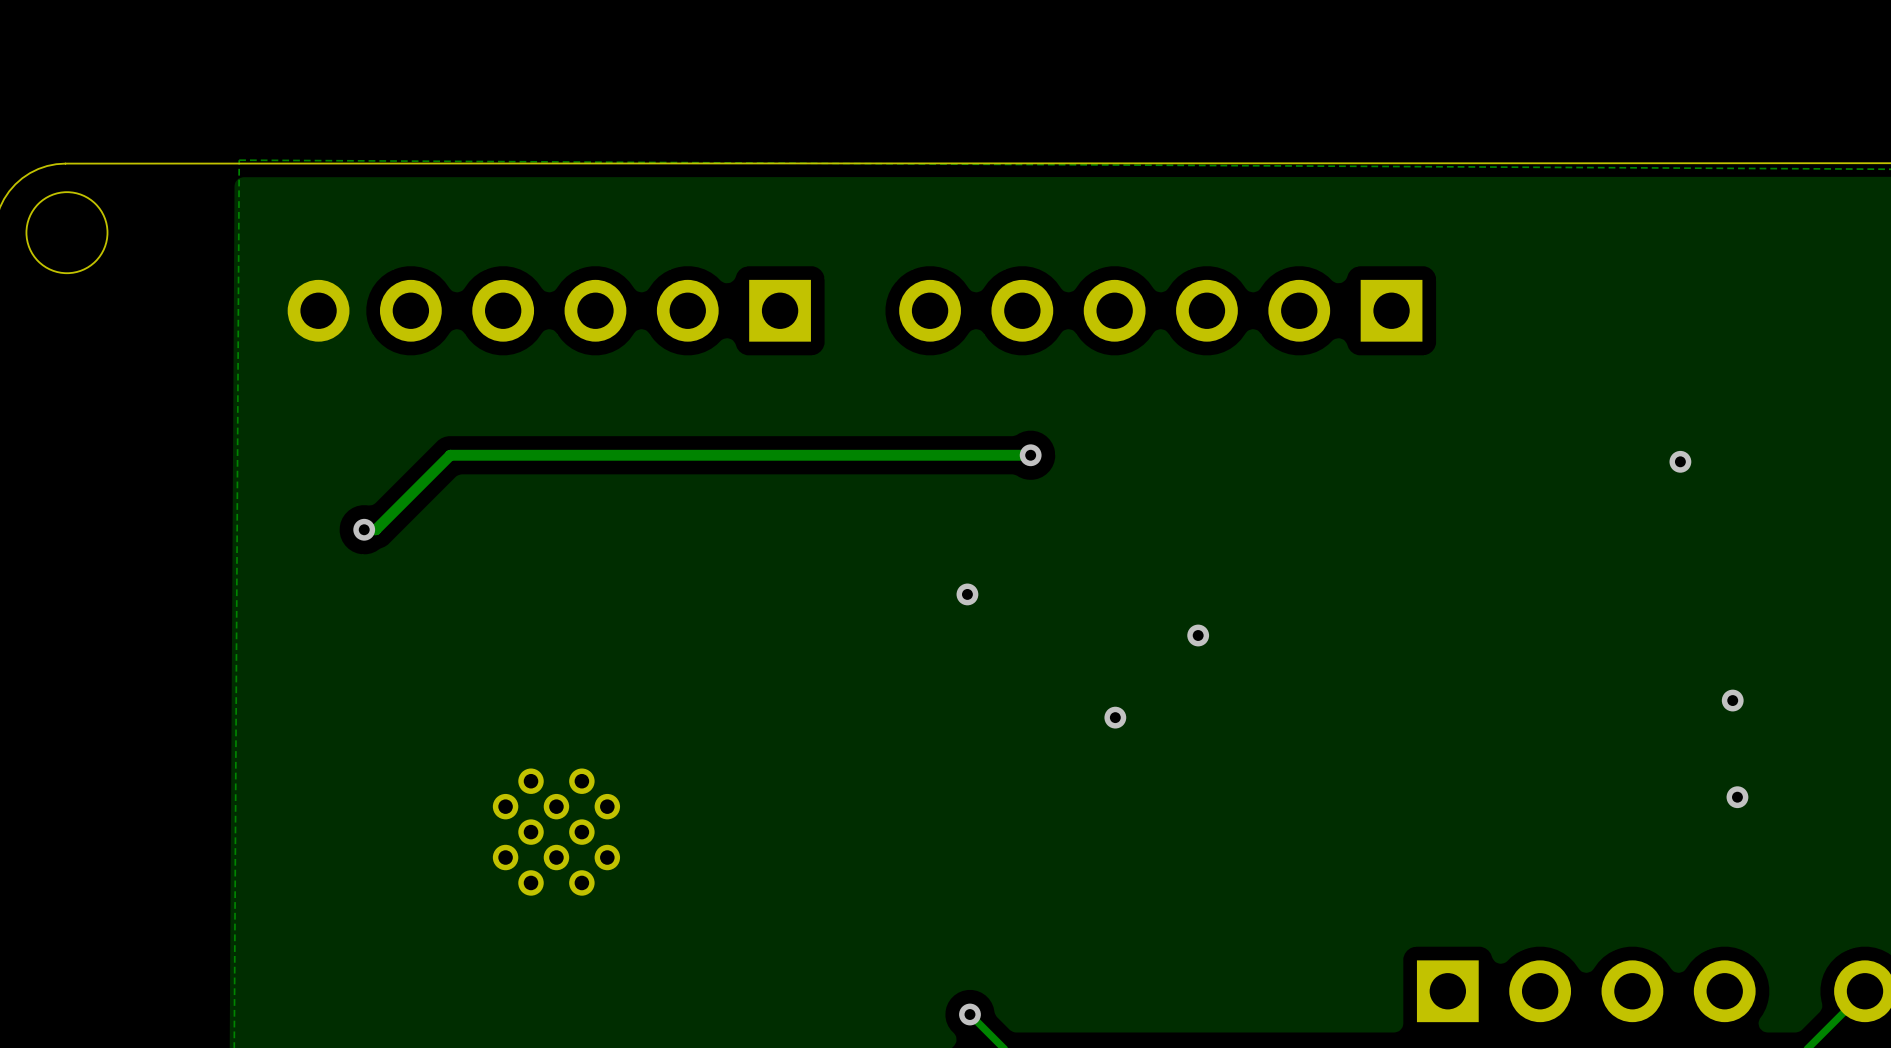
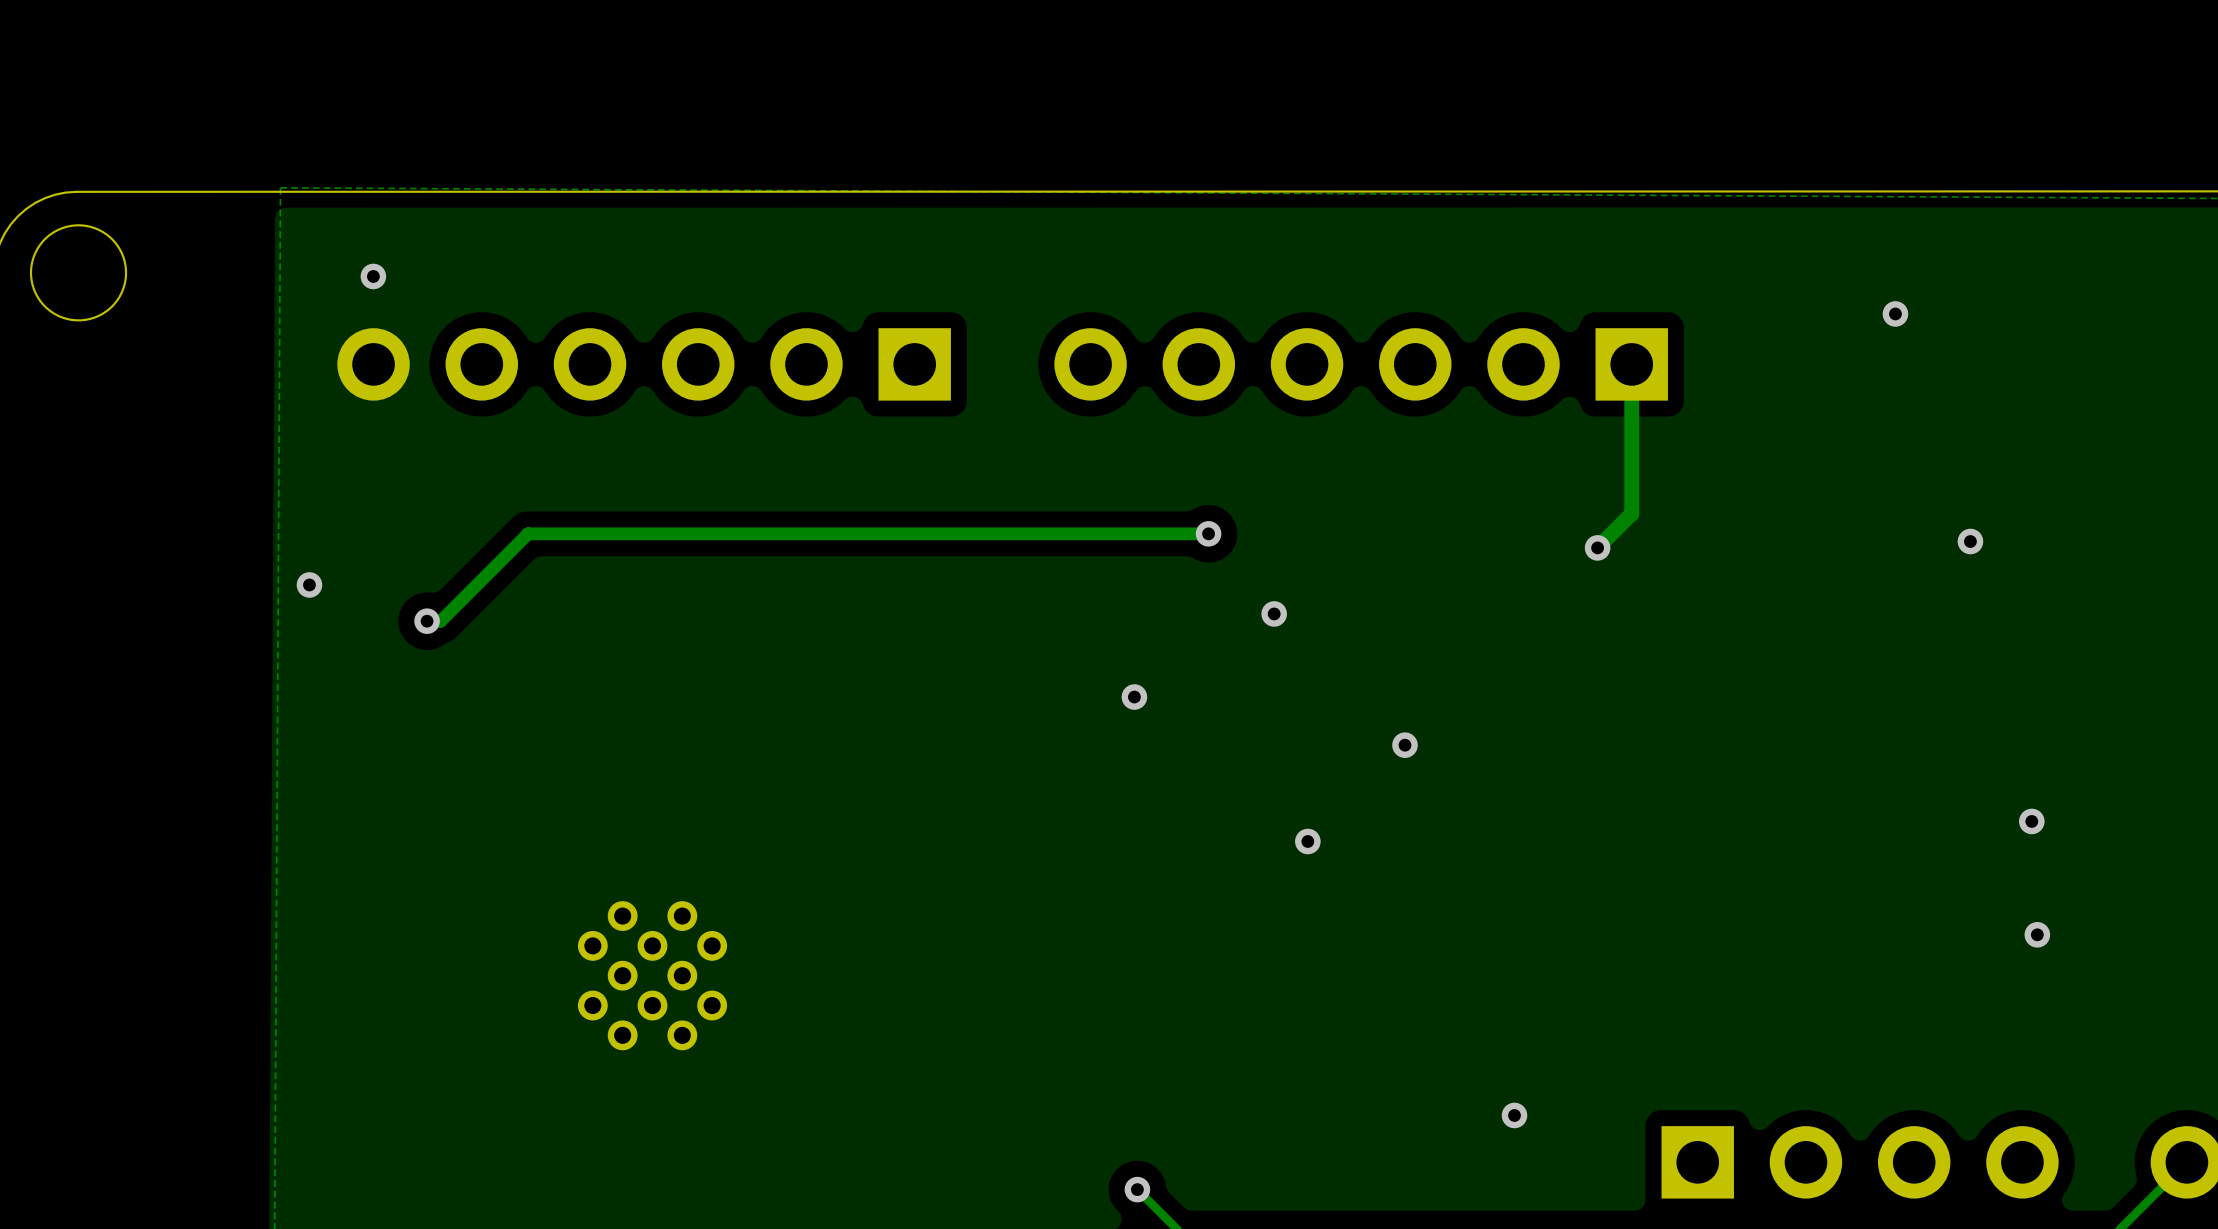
via: none -> (373, 276)
via: none -> (1895, 313)
track: none -> (1631, 364) (1631, 513) (1597, 547)
via: none -> (1597, 547)
via: none -> (309, 584)
via: none -> (1274, 613)
via: none -> (1514, 1115)

